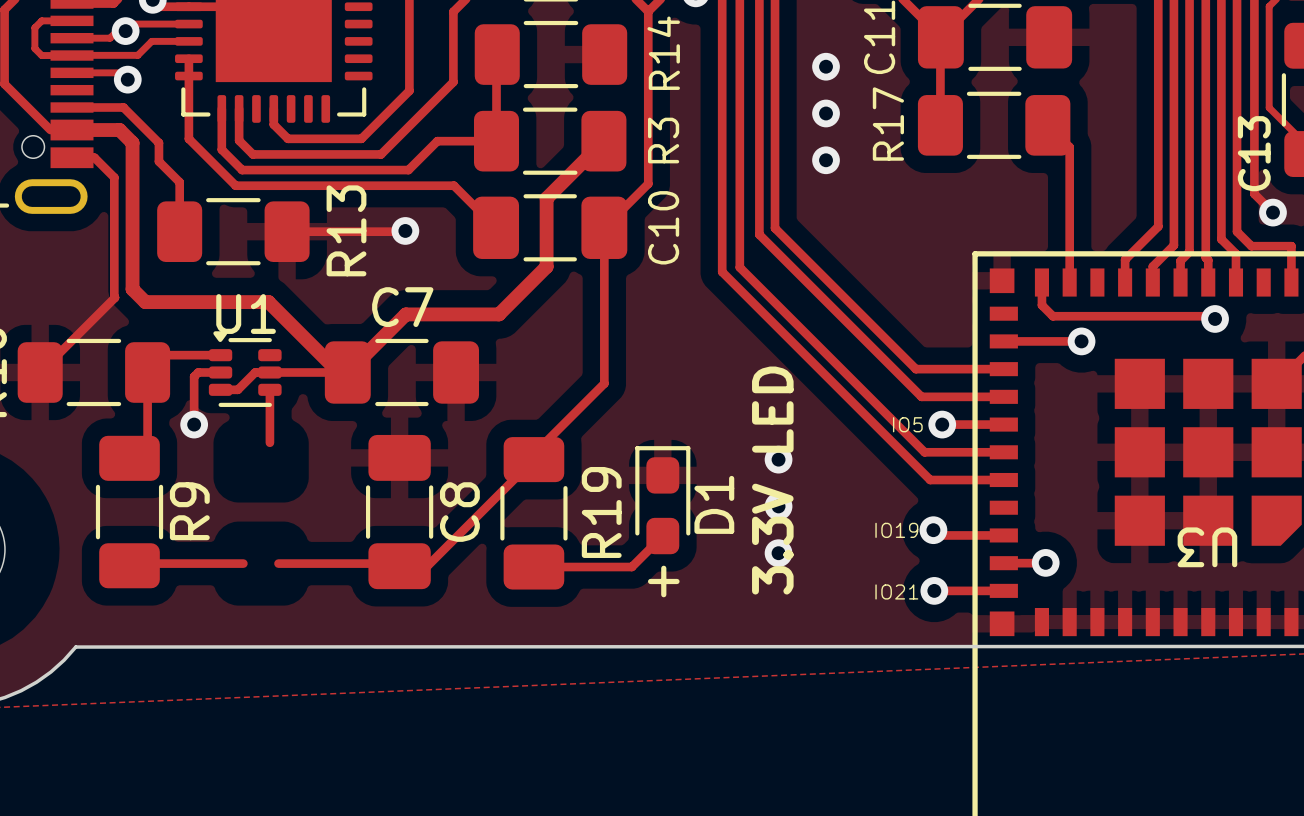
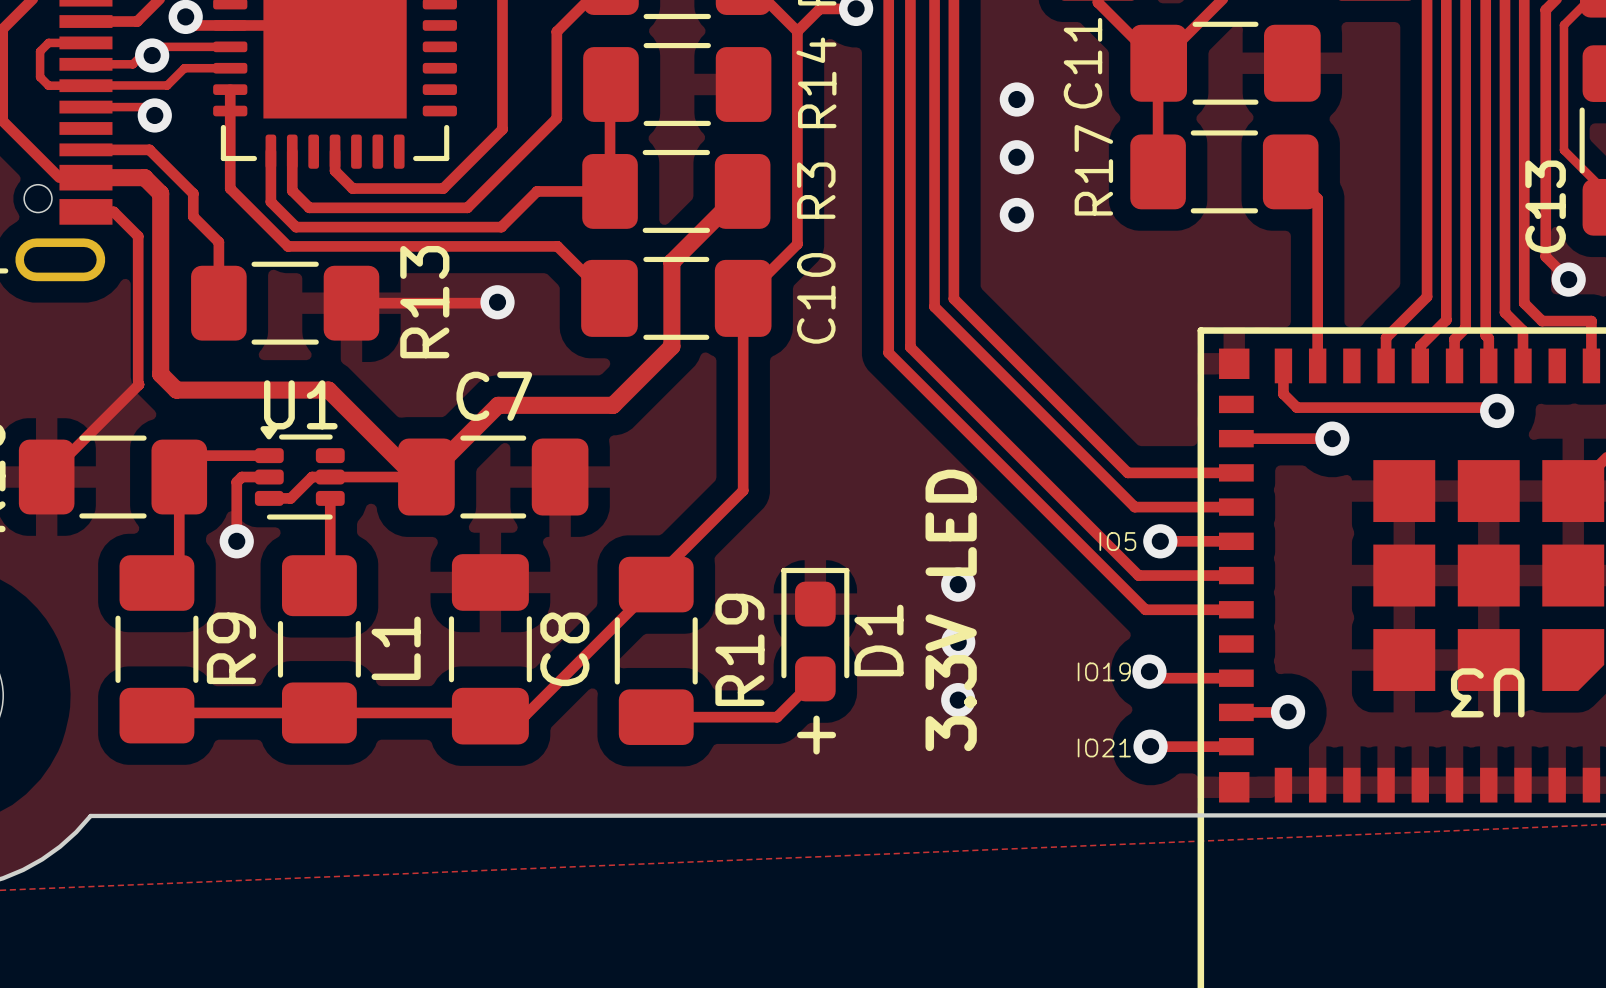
L1: none -> (319, 649)

